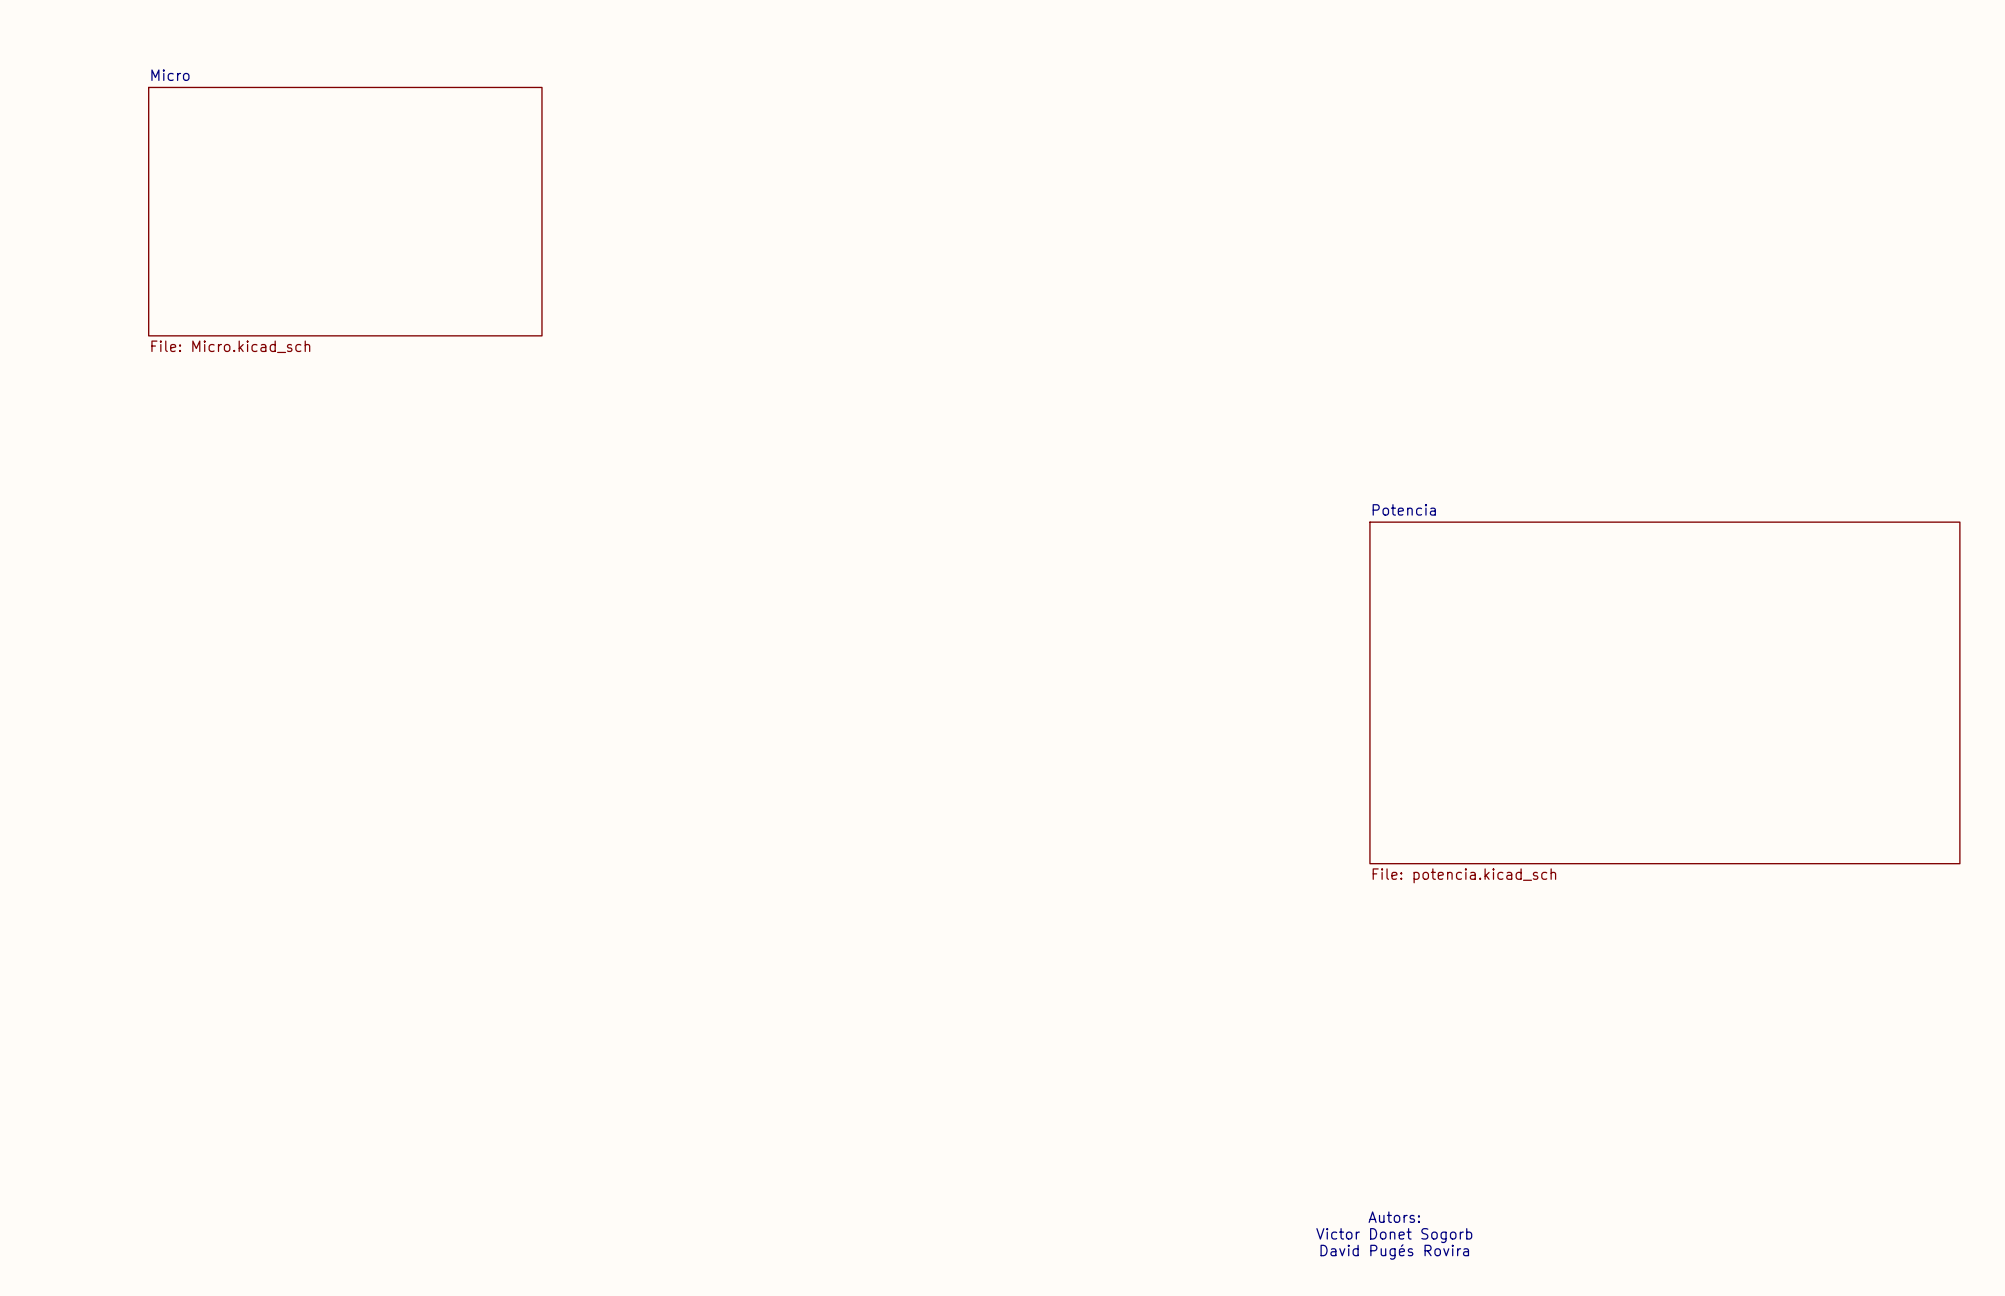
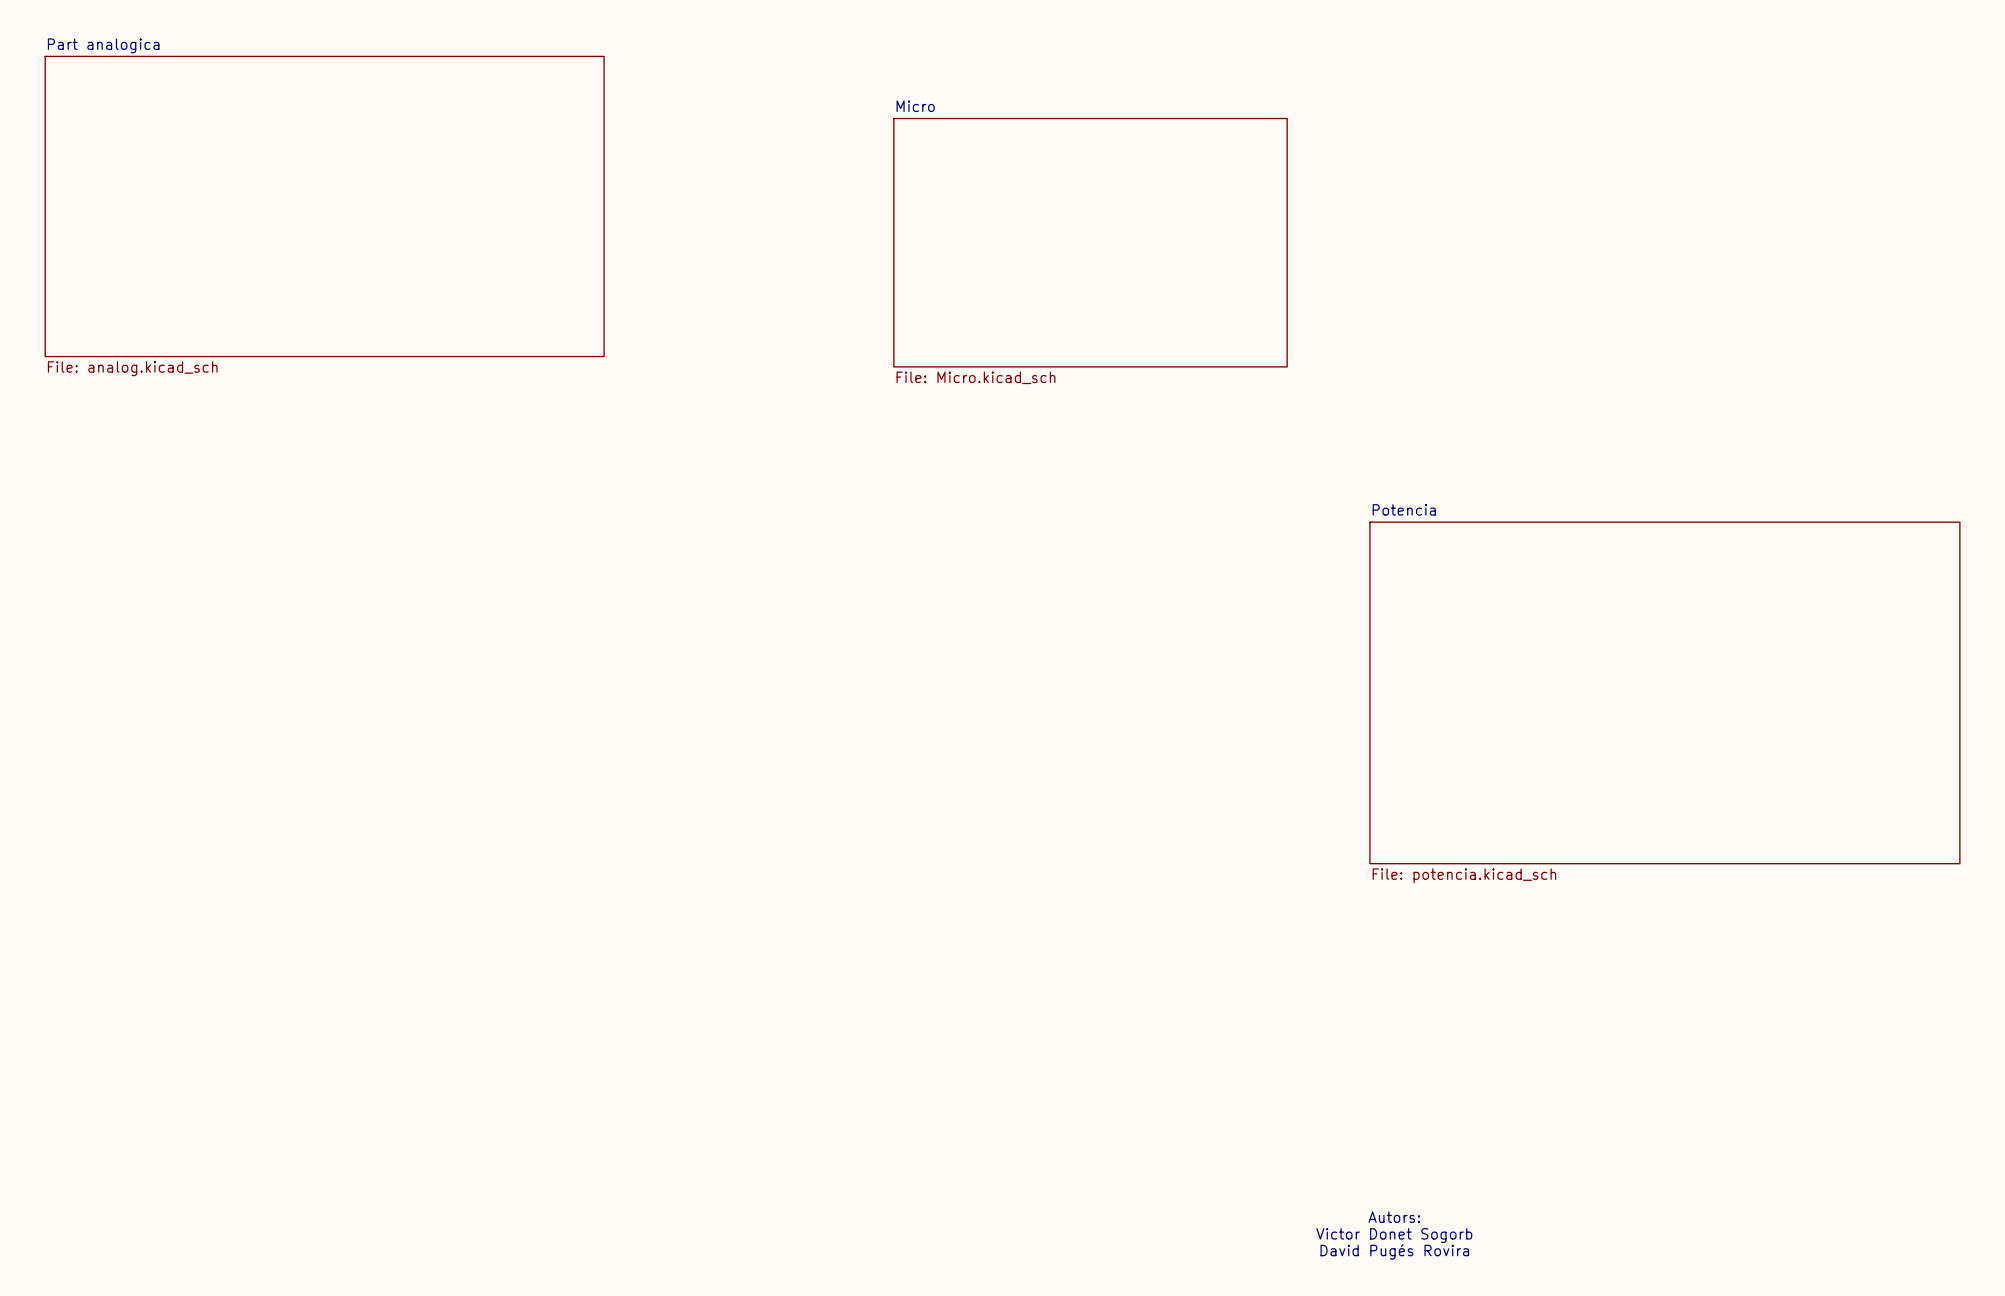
sheet Part analogica: none -> File: analog.kicad_sch (324, 206)
sheet Micro: File: Micro.kicad_sch (345, 211) -> none
sheet Micro: none -> File: Micro.kicad_sch (1090, 242)

